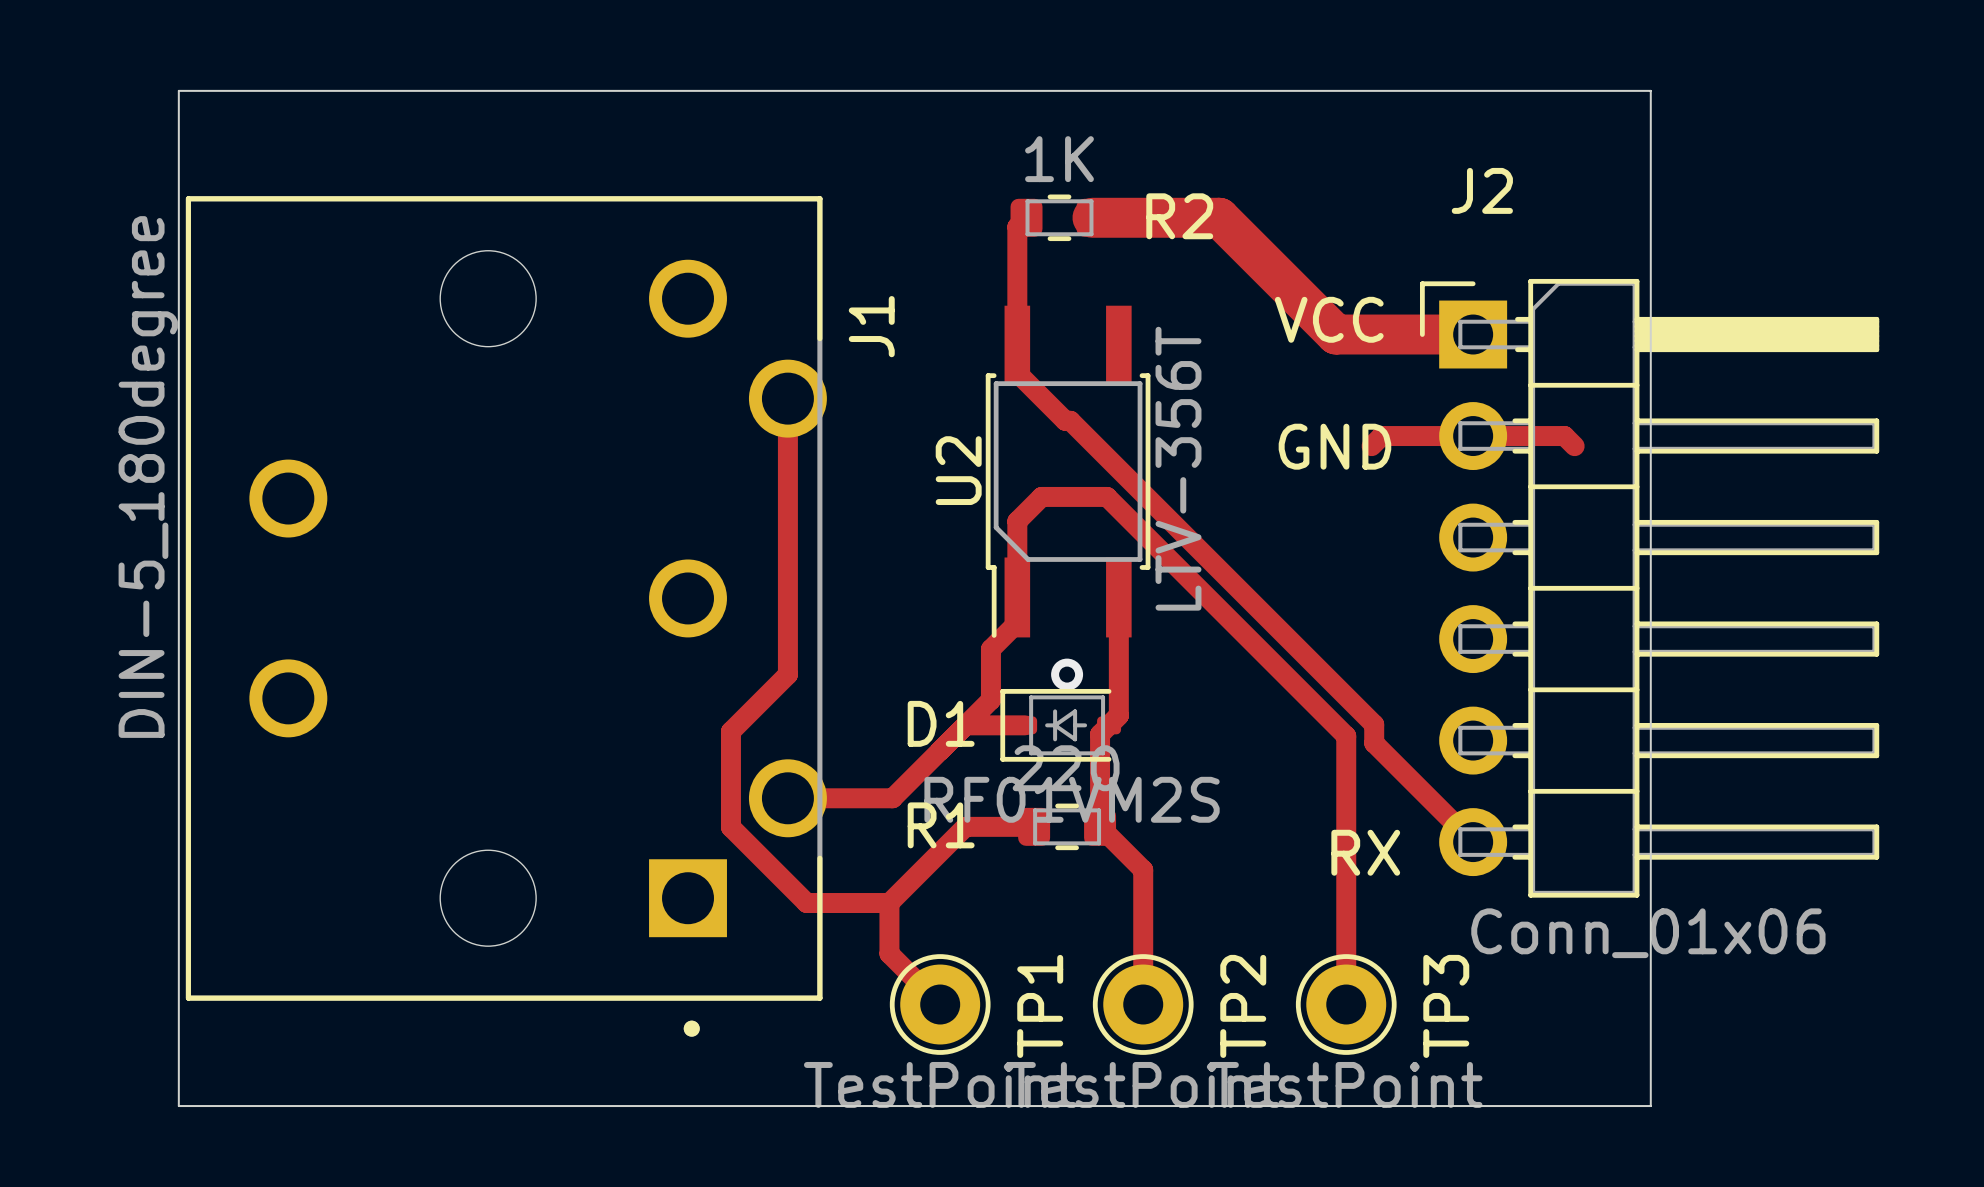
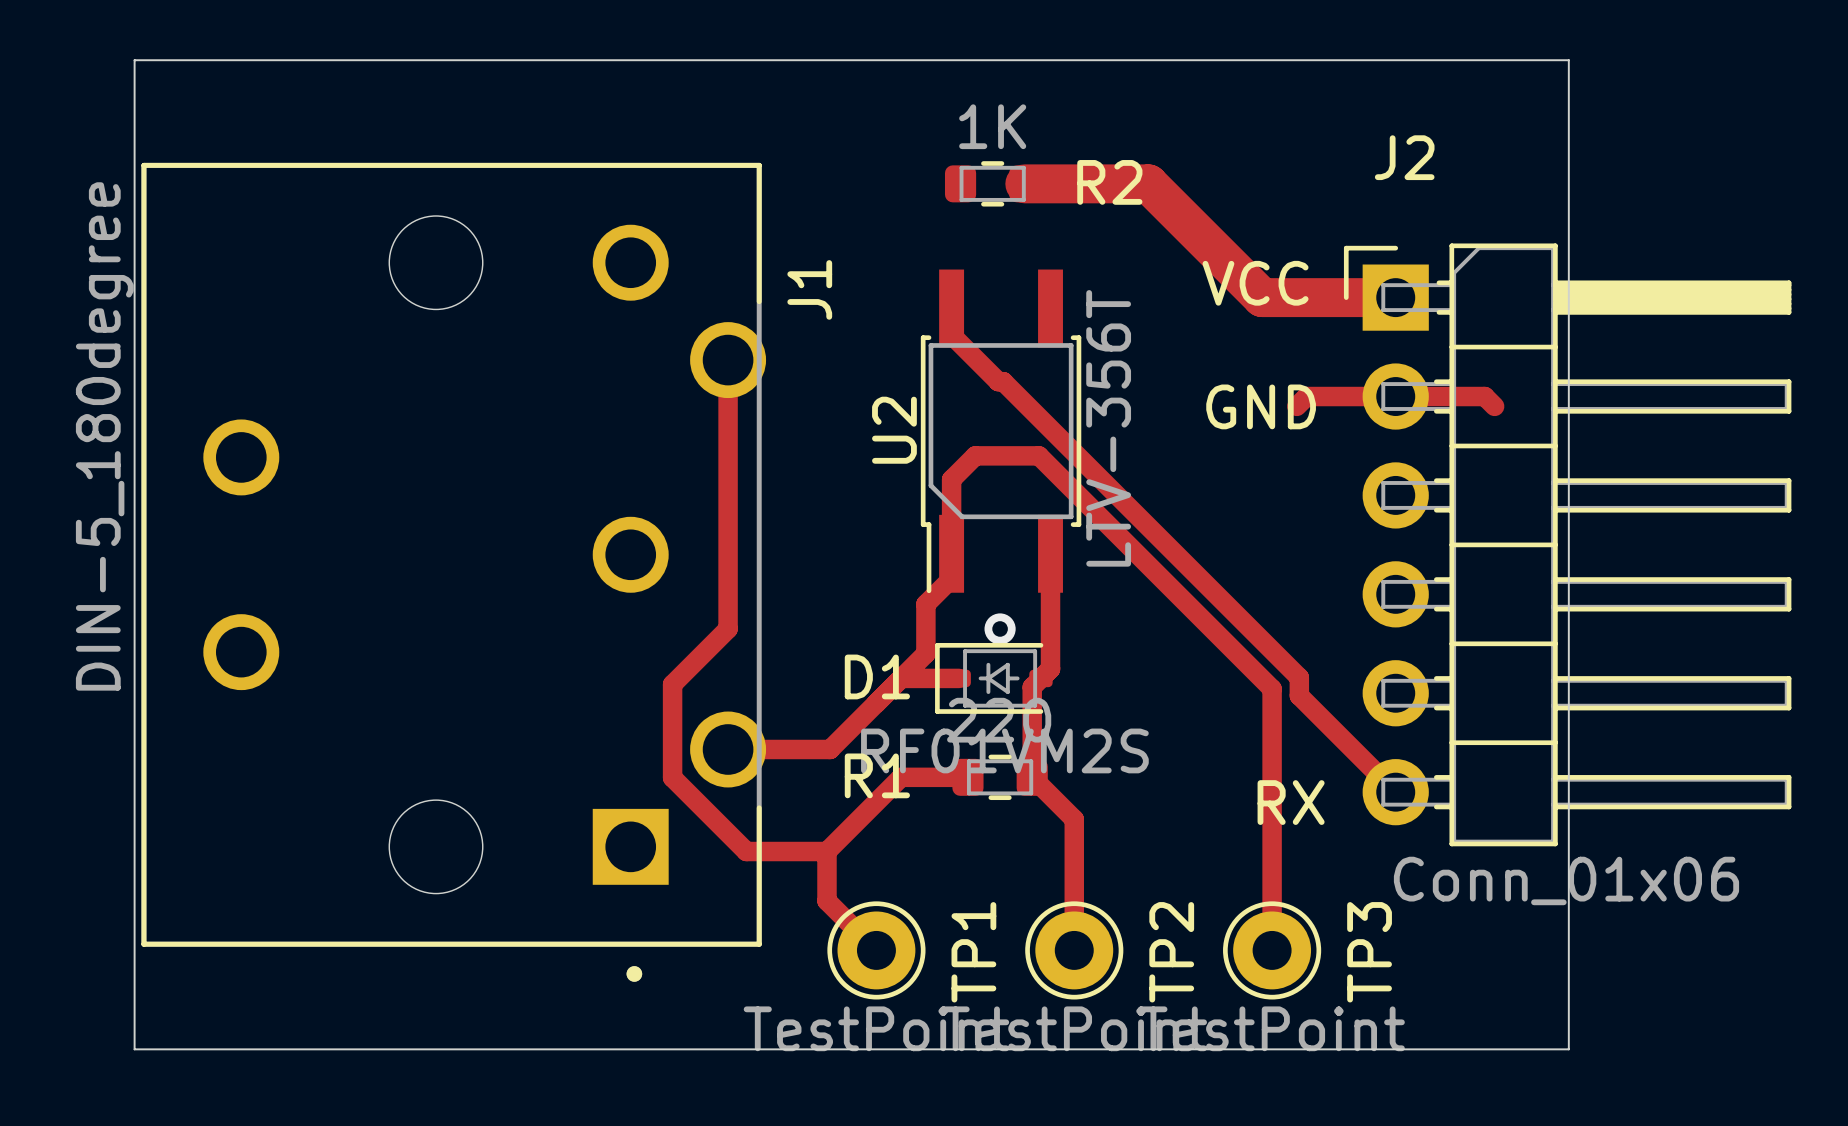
top track: (1026, 217) (1017, 226) (1017, 345) -> none

